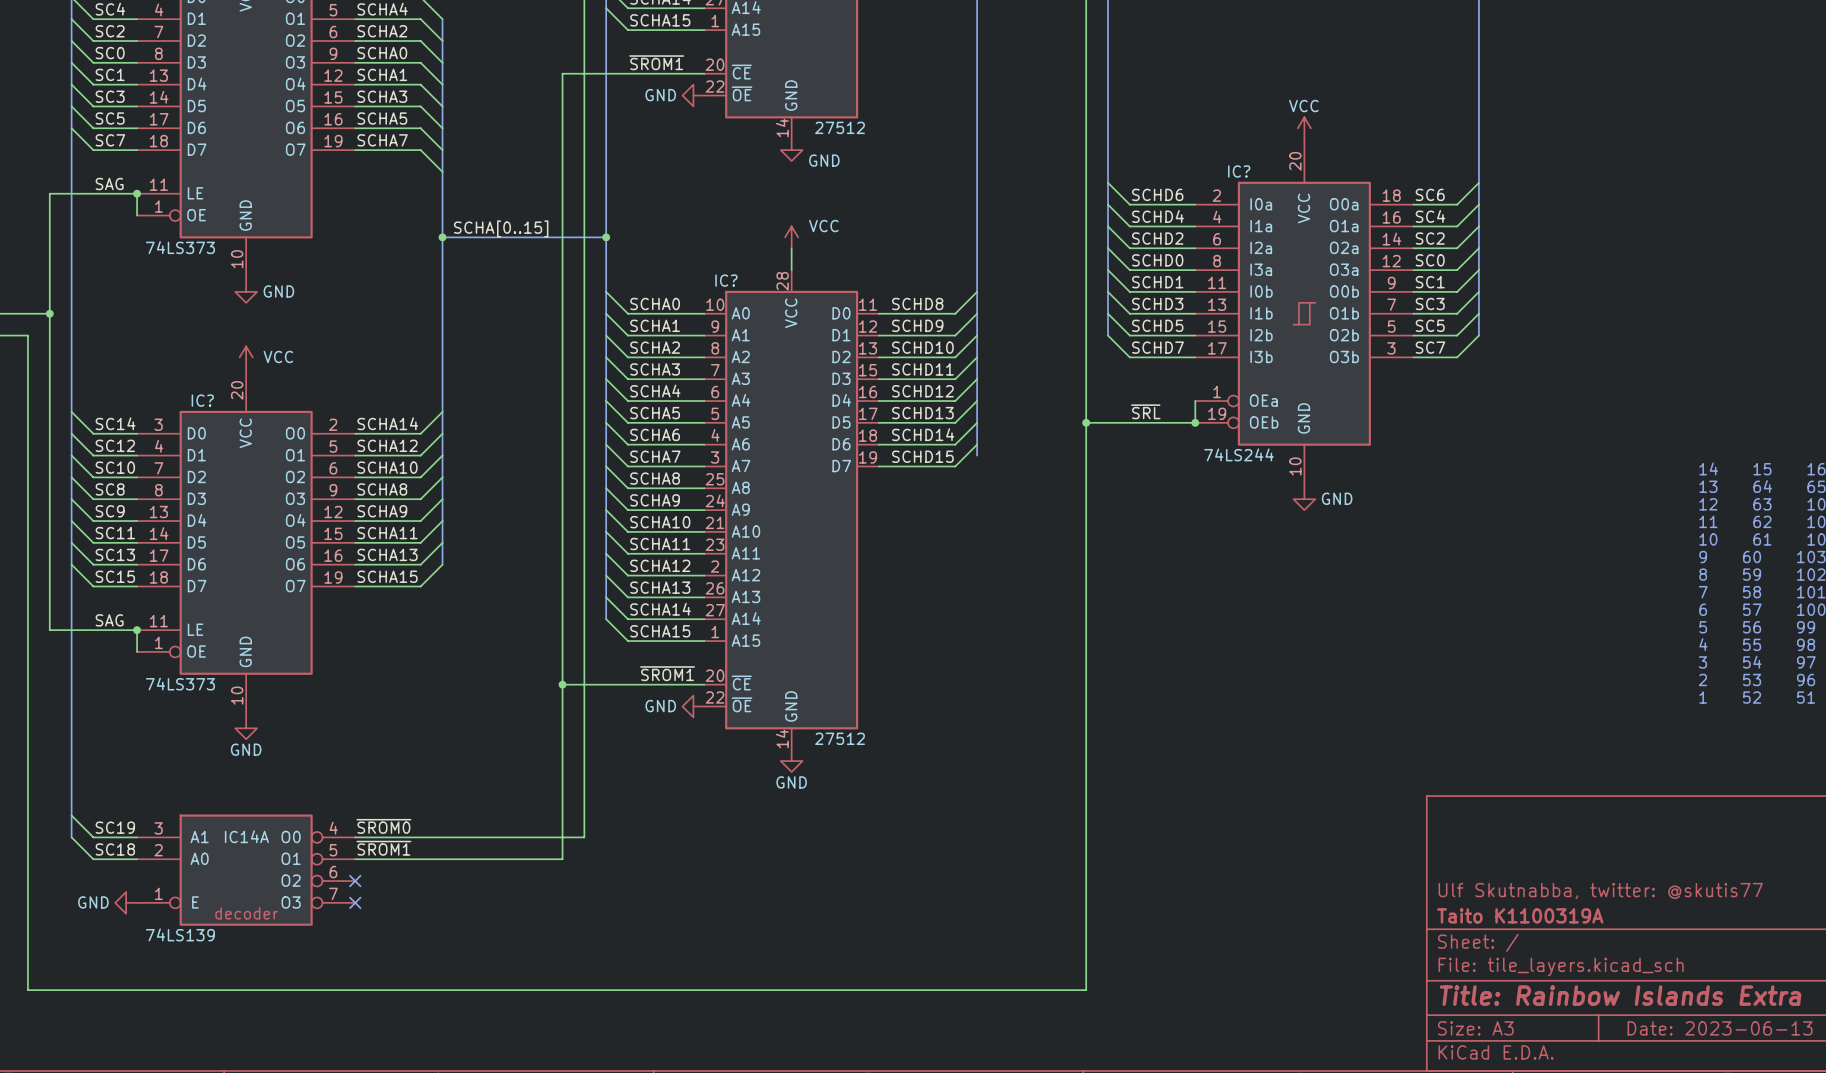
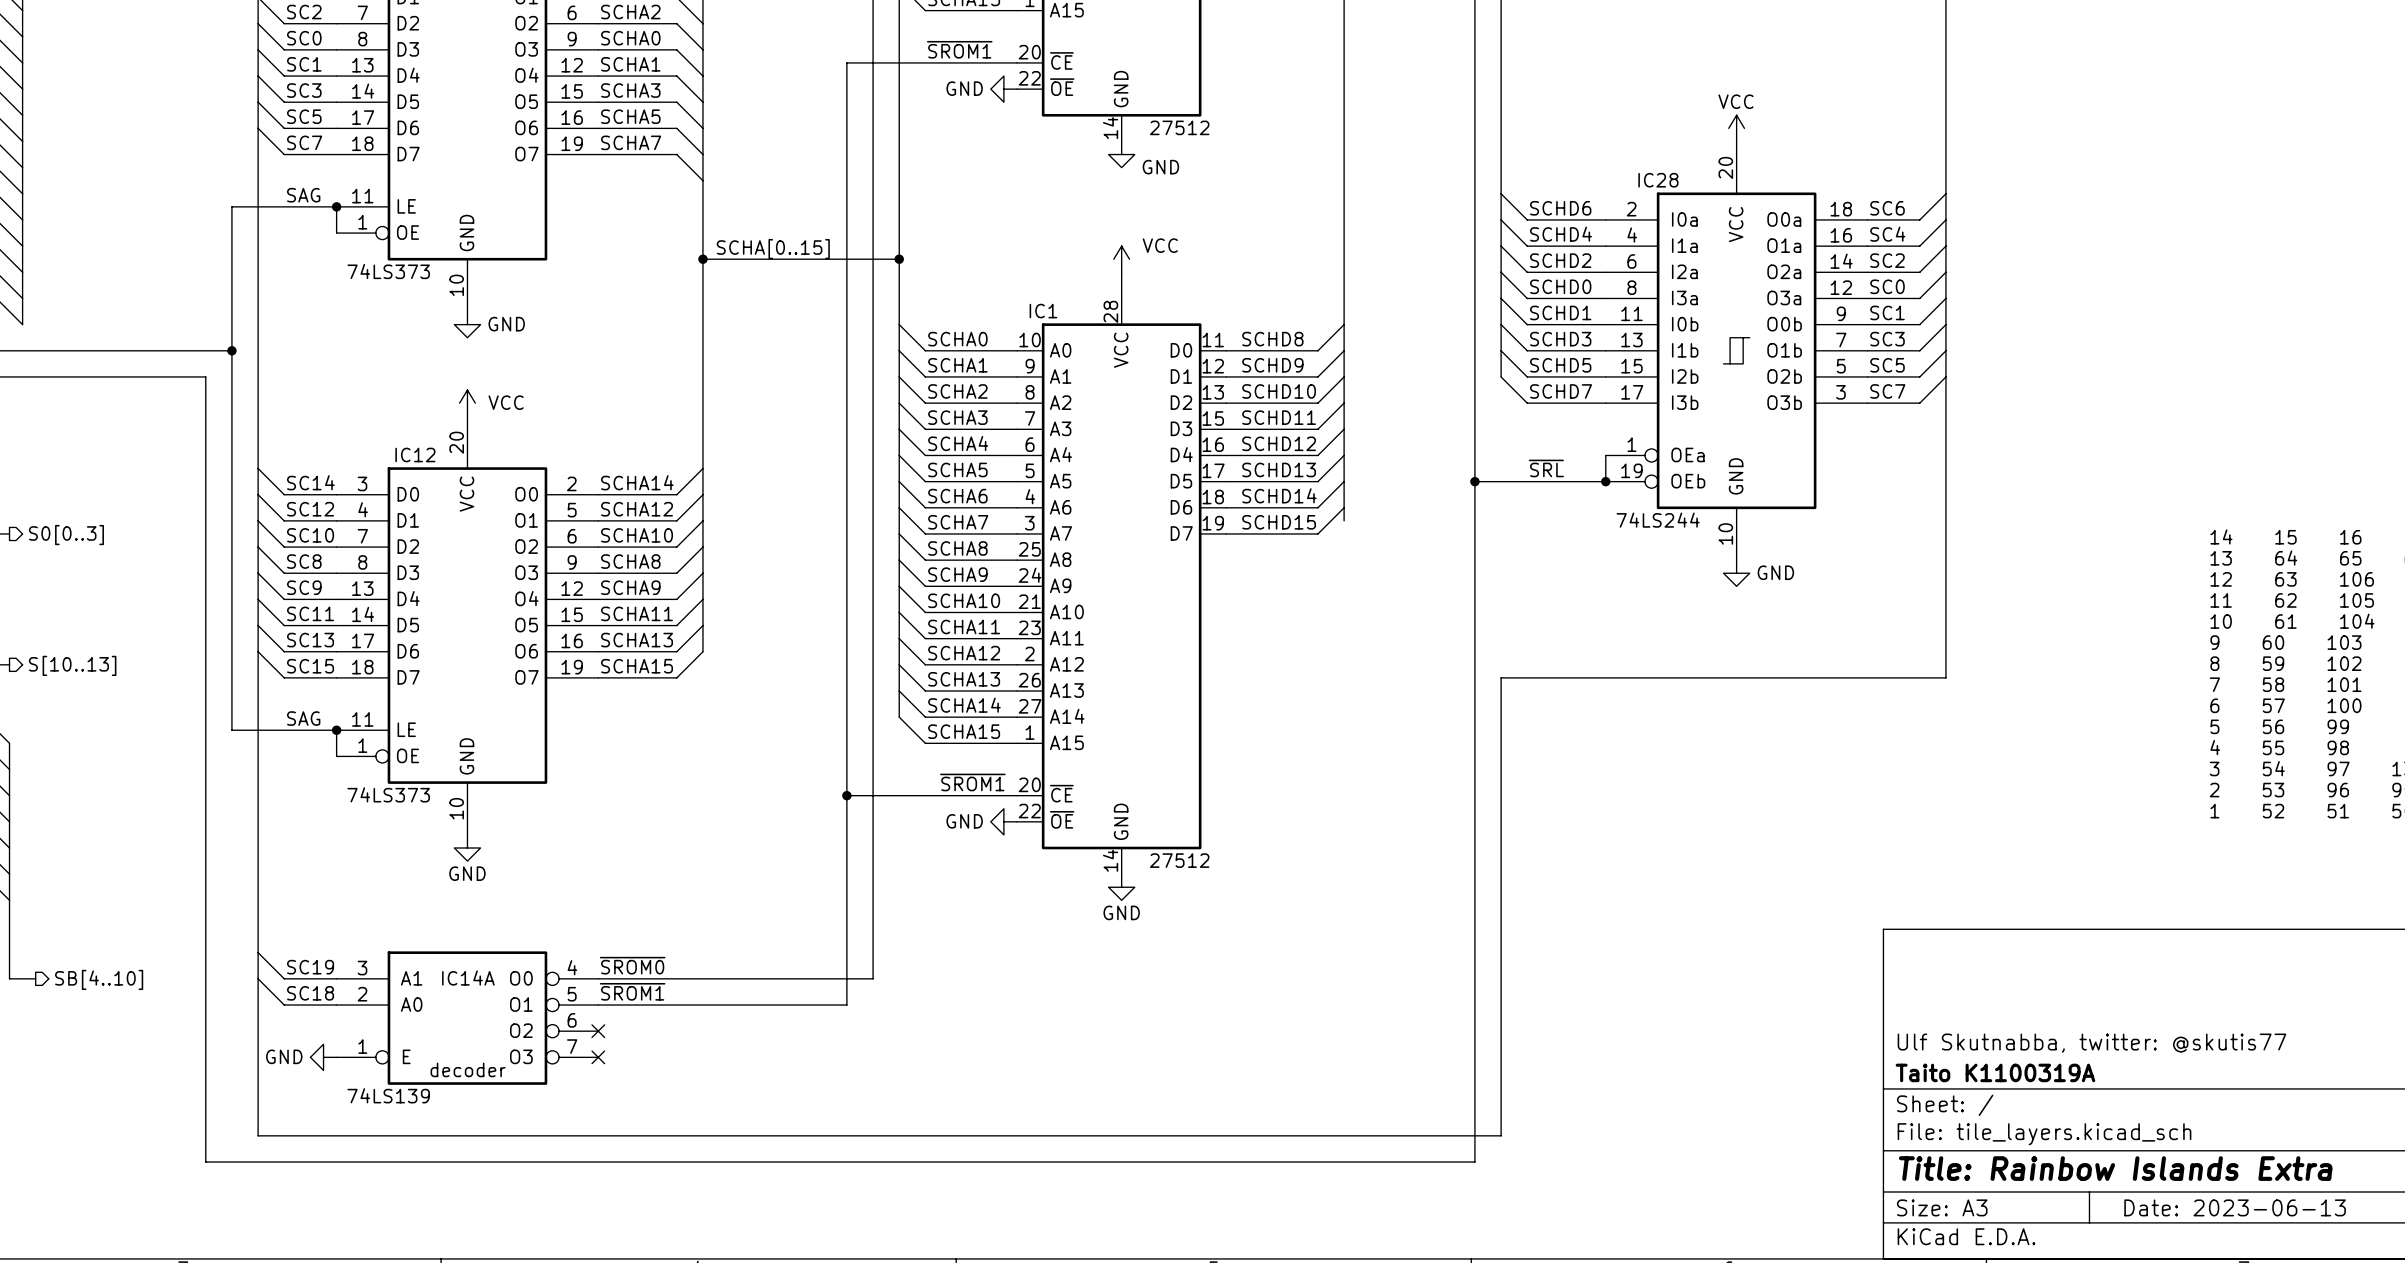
IC? name: IC? (1239, 171) -> IC28 (1658, 180)
IC? name: IC? (726, 280) -> IC1 (1043, 311)
bus: none -> (1945, 376) (1945, 677) (1501, 677) (1501, 1135) (258, 1135) (258, 978)
IC? name: IC? (202, 400) -> IC12 (415, 454)

